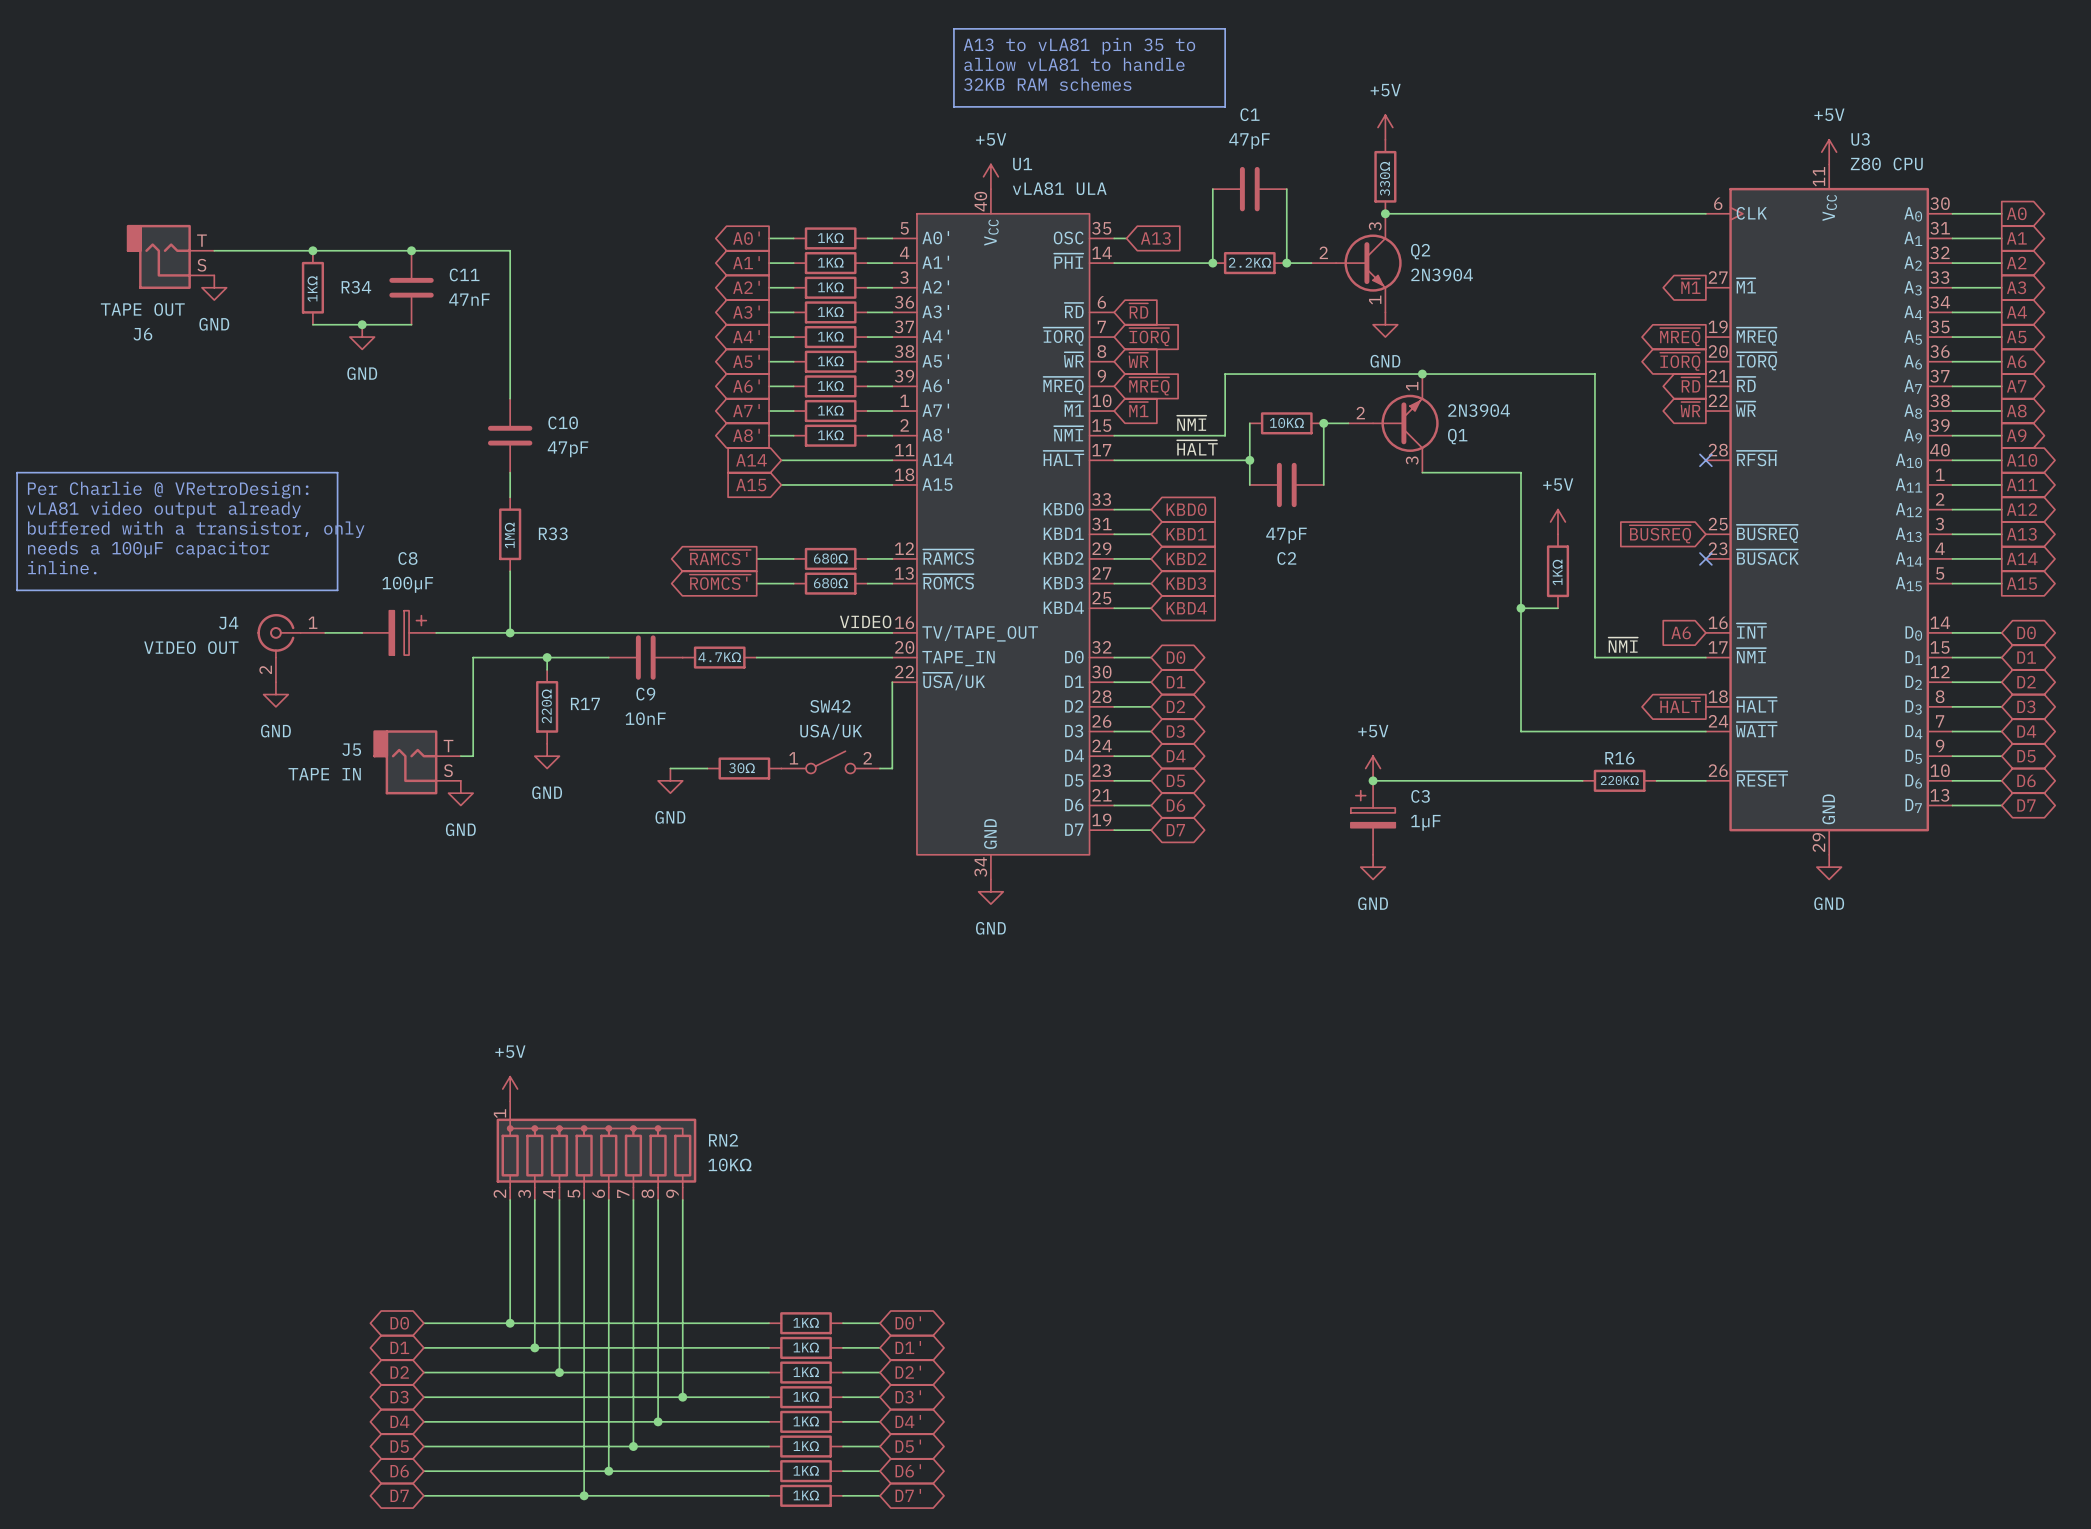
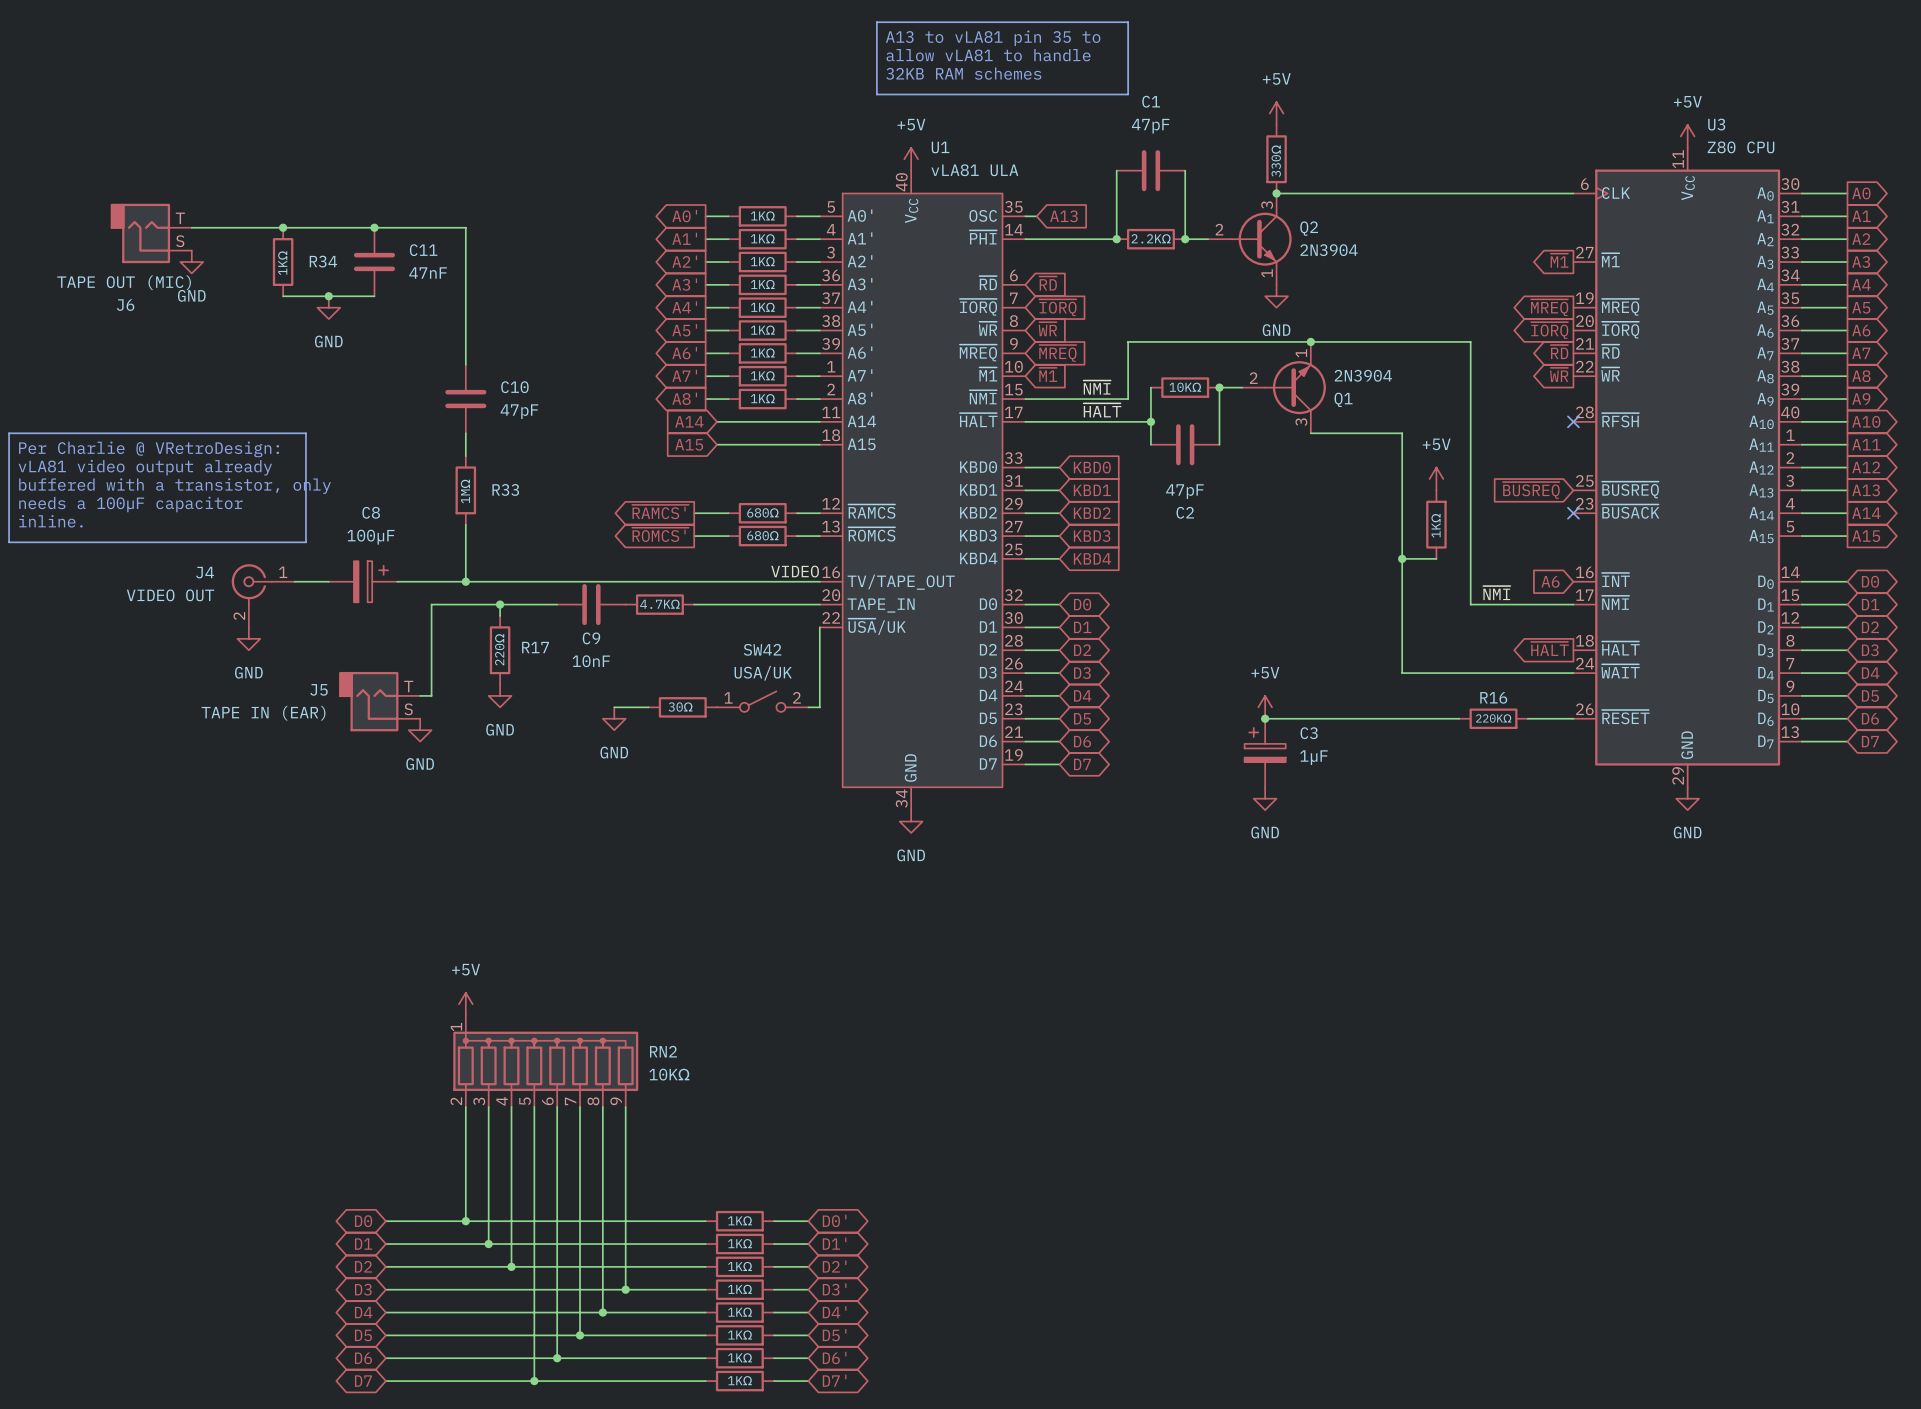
J6 value: TAPE OUT (142, 309) -> TAPE OUT (MIC) (124, 282)
J5 value: TAPE IN (324, 774) -> TAPE IN (EAR) (263, 713)

